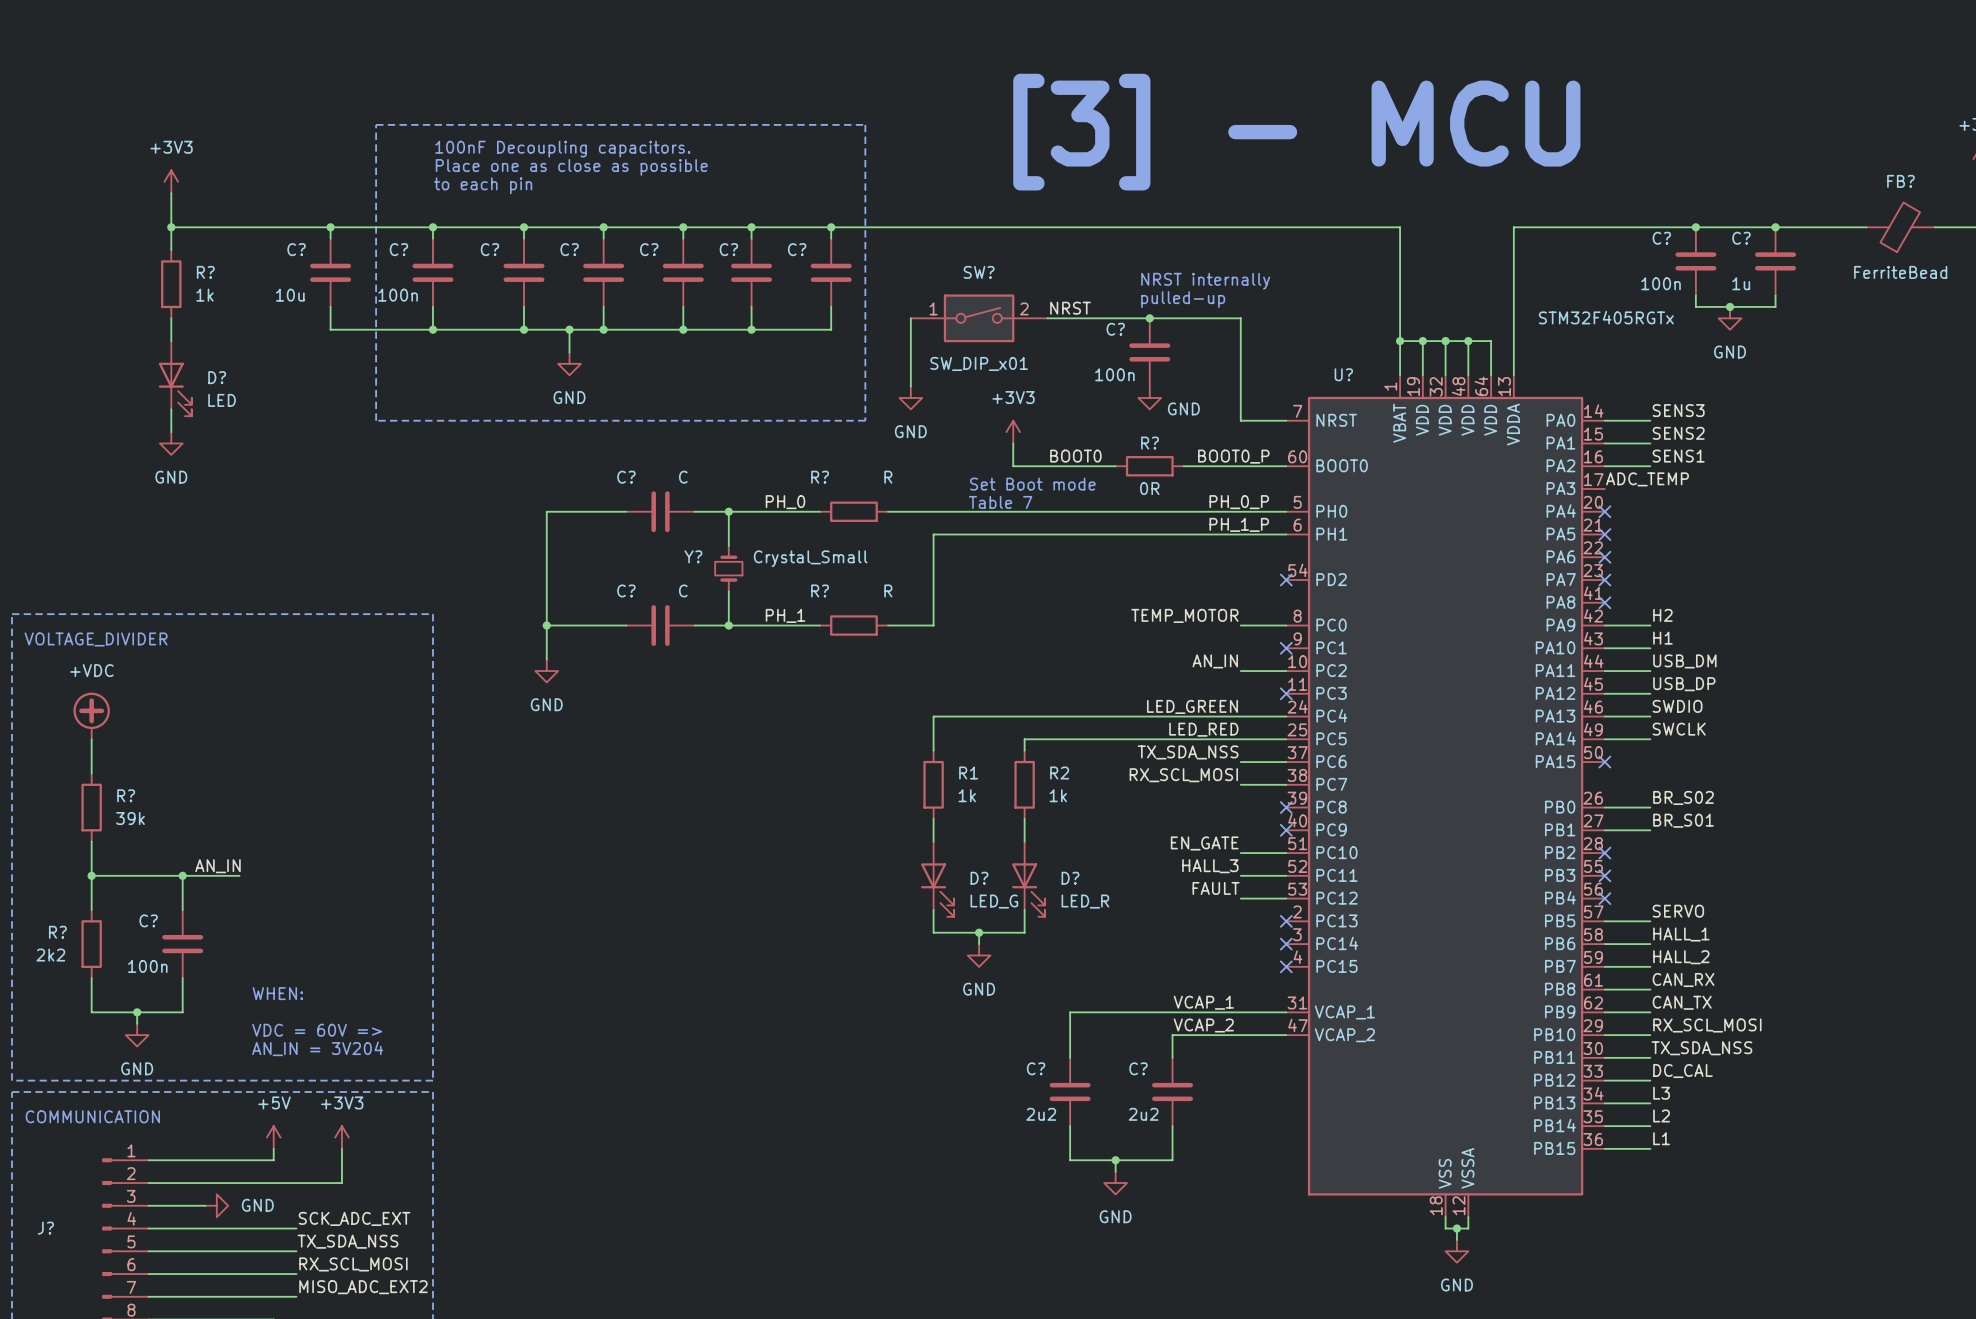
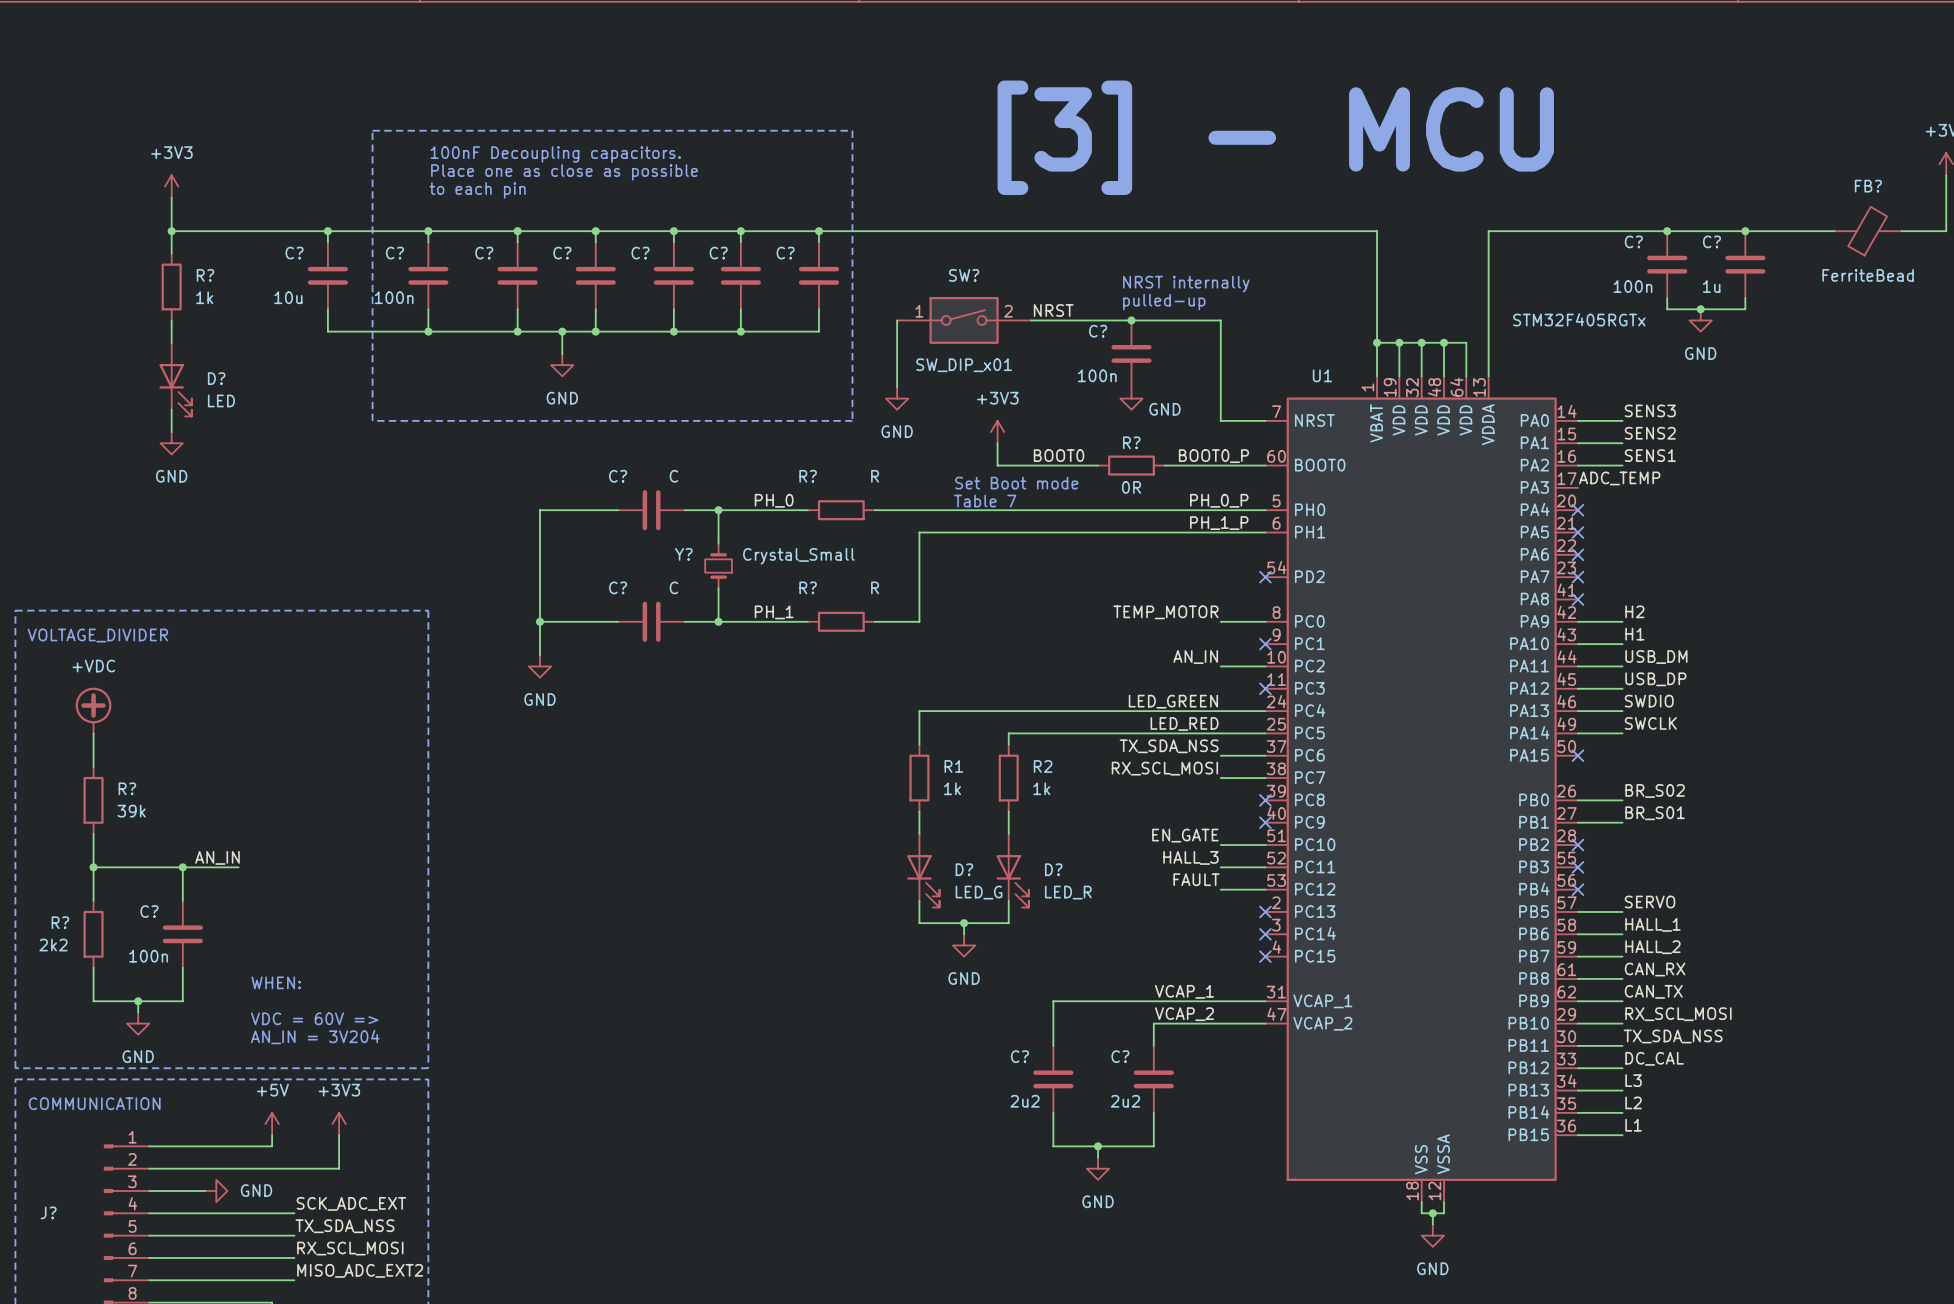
U? name: U? (1343, 374) -> U1 (1322, 375)

